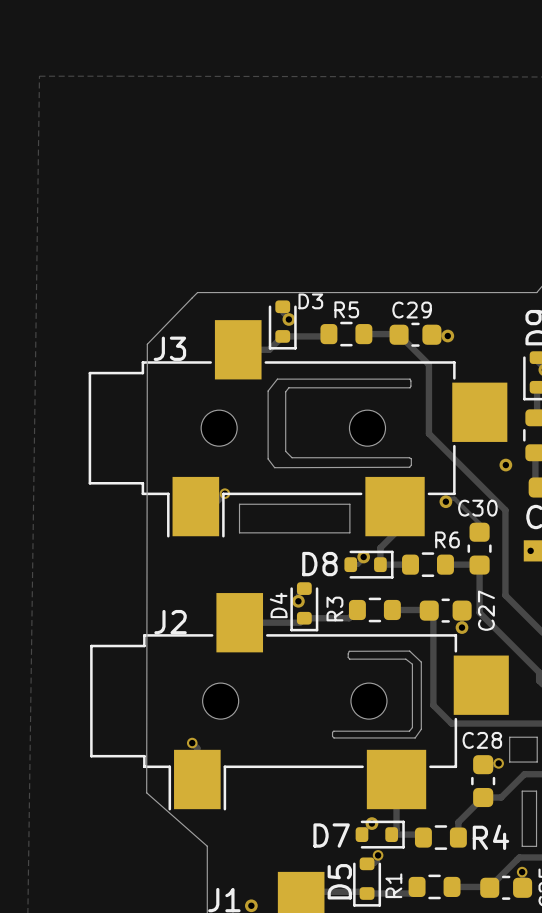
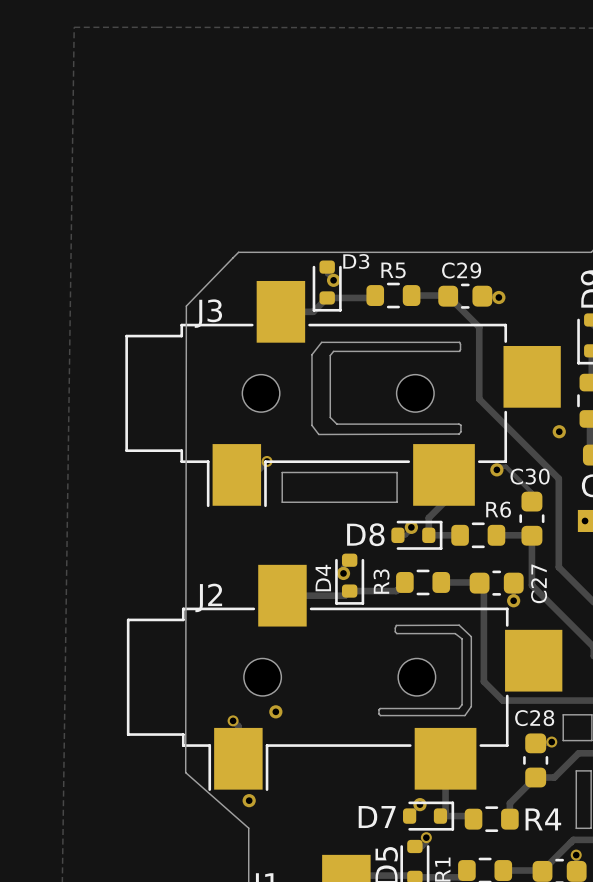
via: none -> (275, 711)
via: none -> (249, 800)

